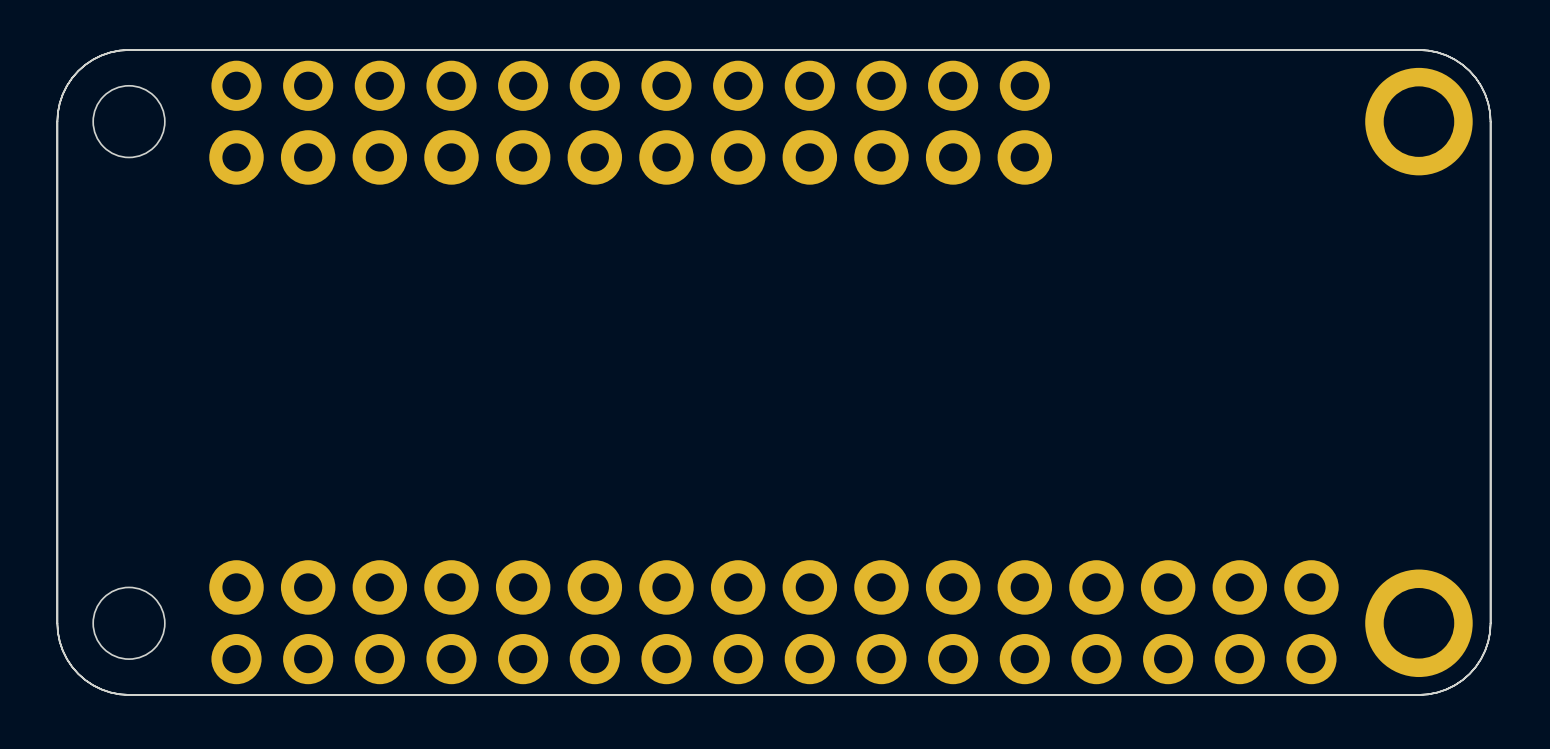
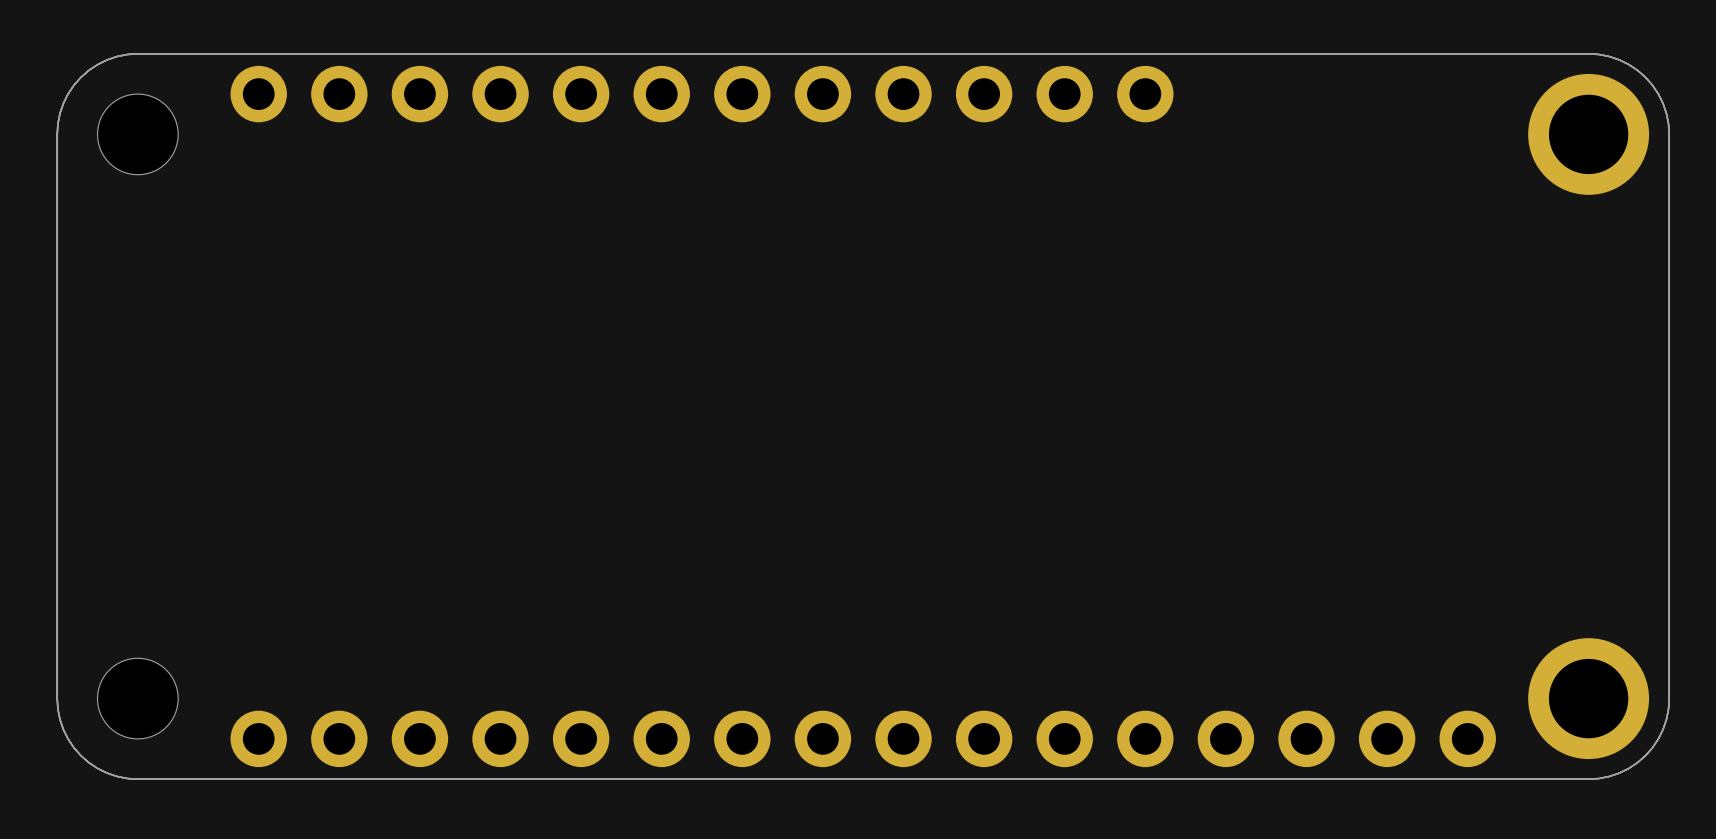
part: (630, 157) -> none
part: (773, 587) -> none

